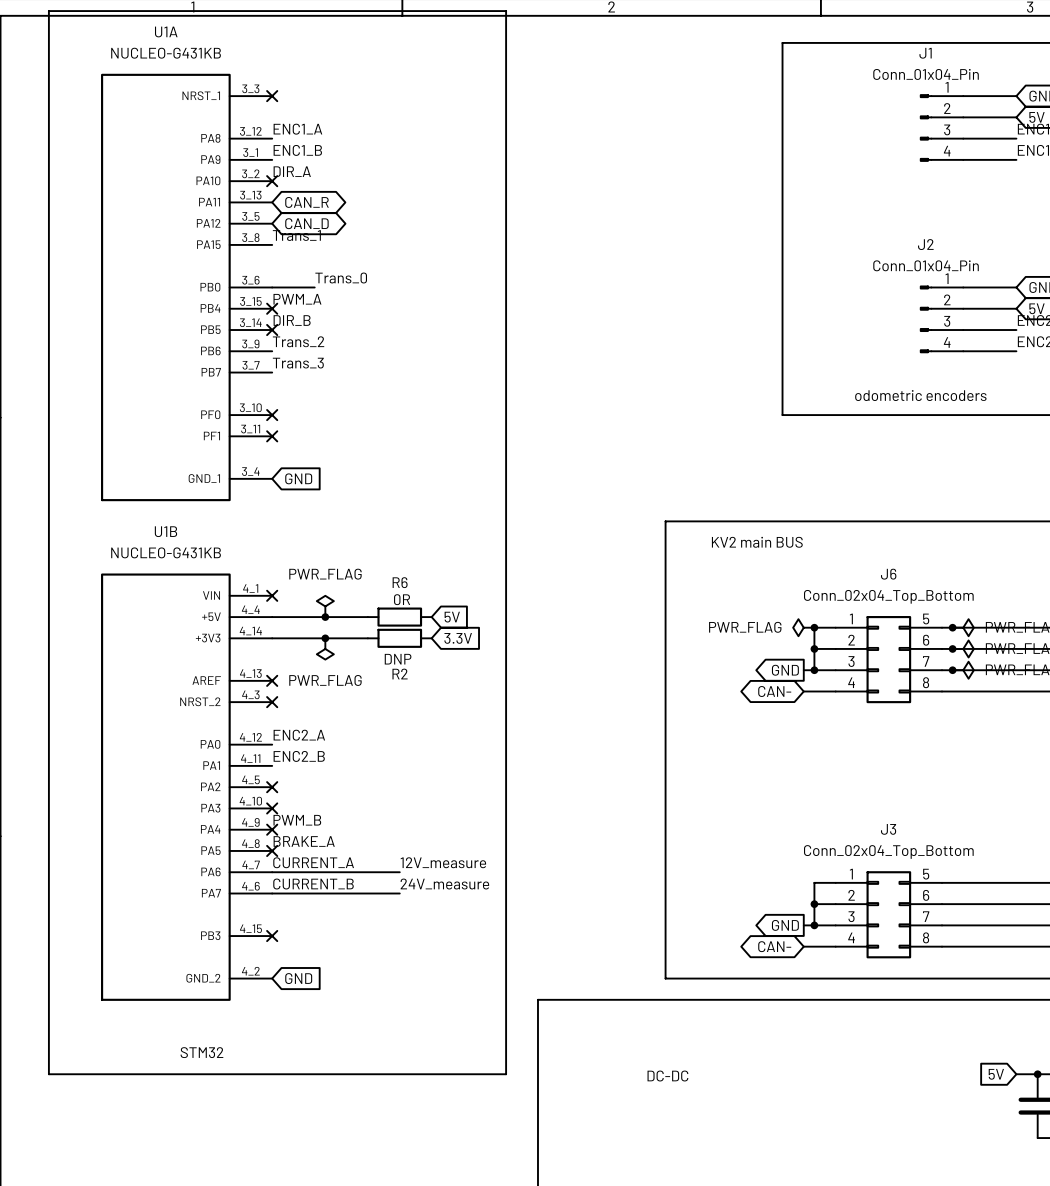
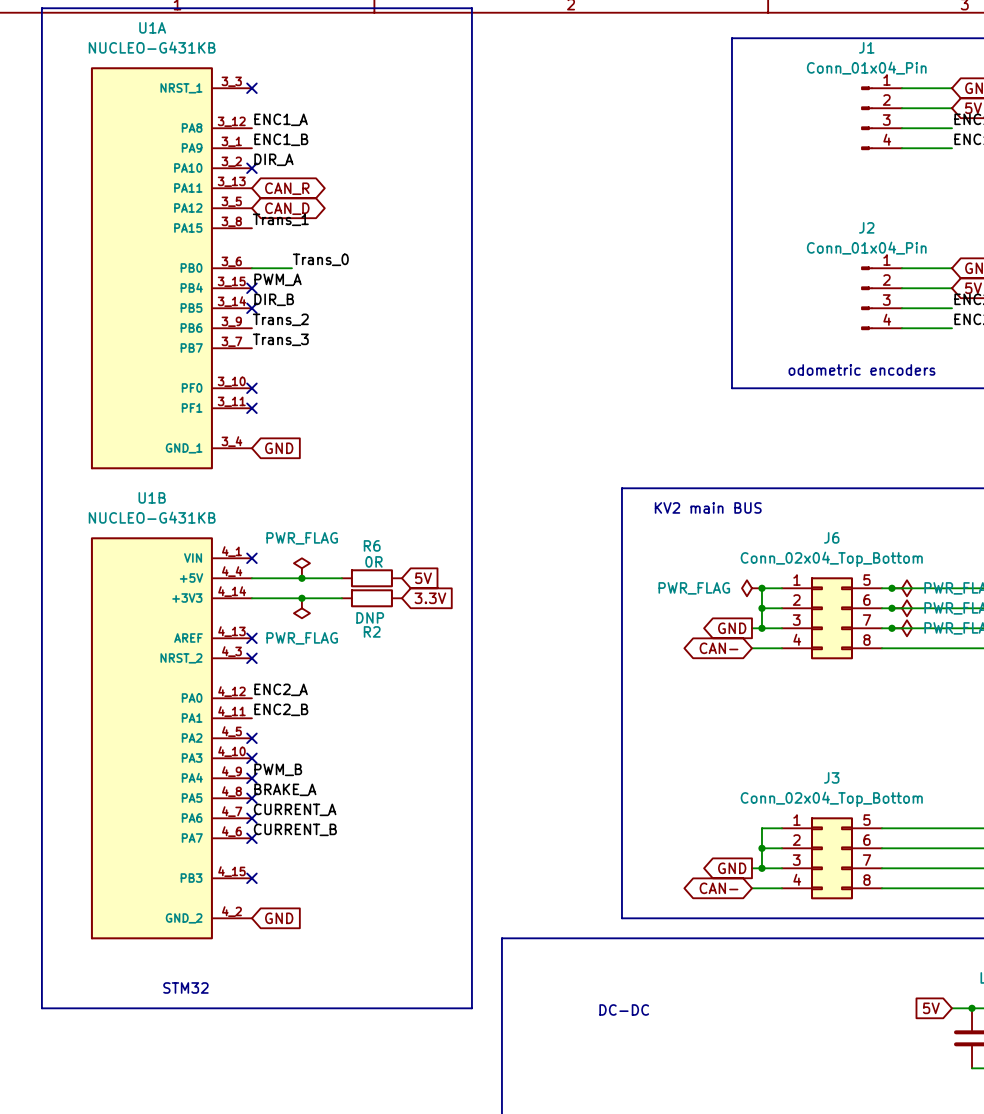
label: 12V_measure (443, 862) -> none
wire: (272, 872) (399, 872) -> none
no-connect mark: none -> (251, 818)
label: 24V_measure (444, 884) -> none
wire: (272, 893) (399, 893) -> none
no-connect mark: none -> (251, 838)

